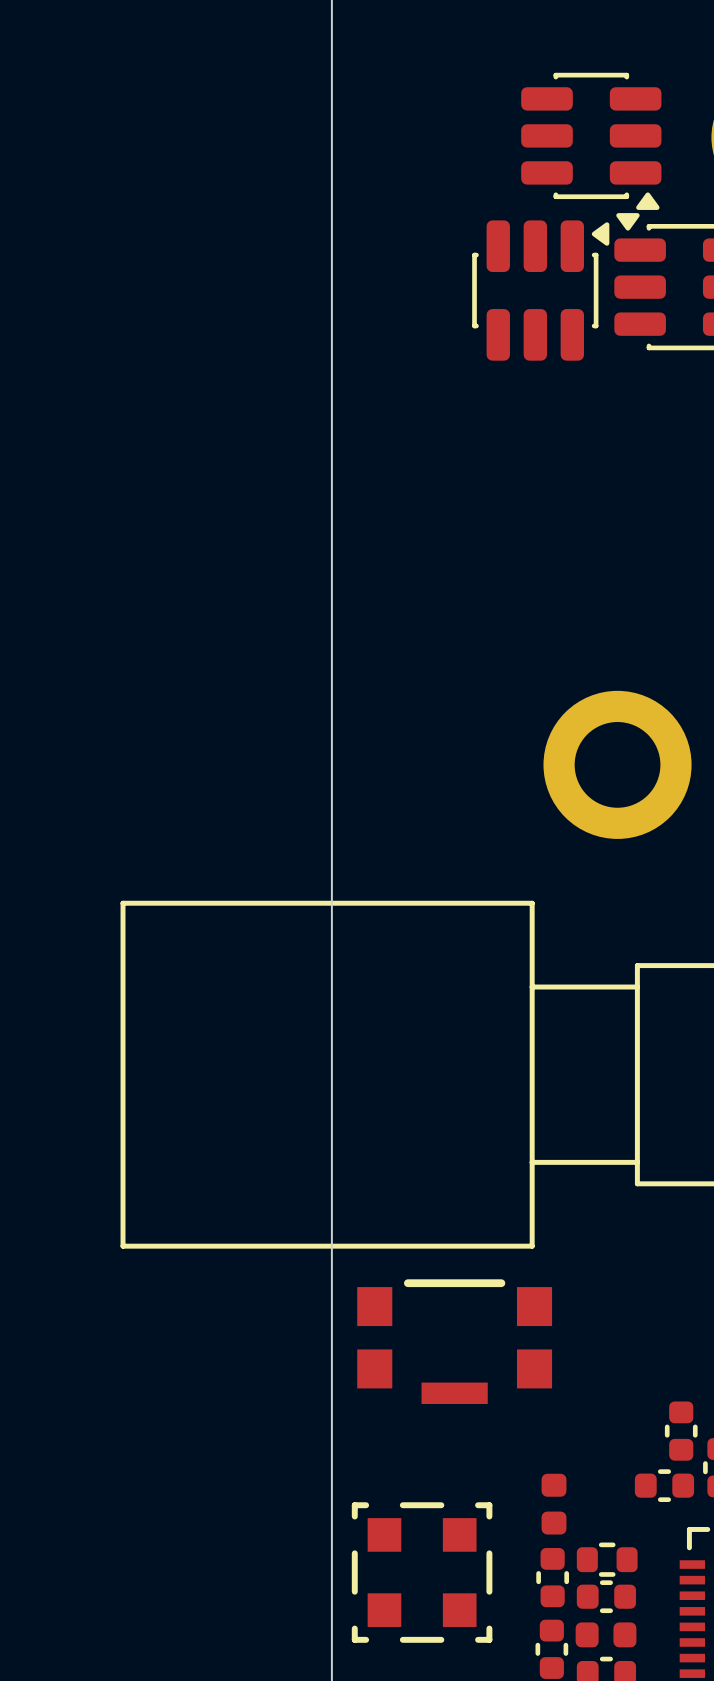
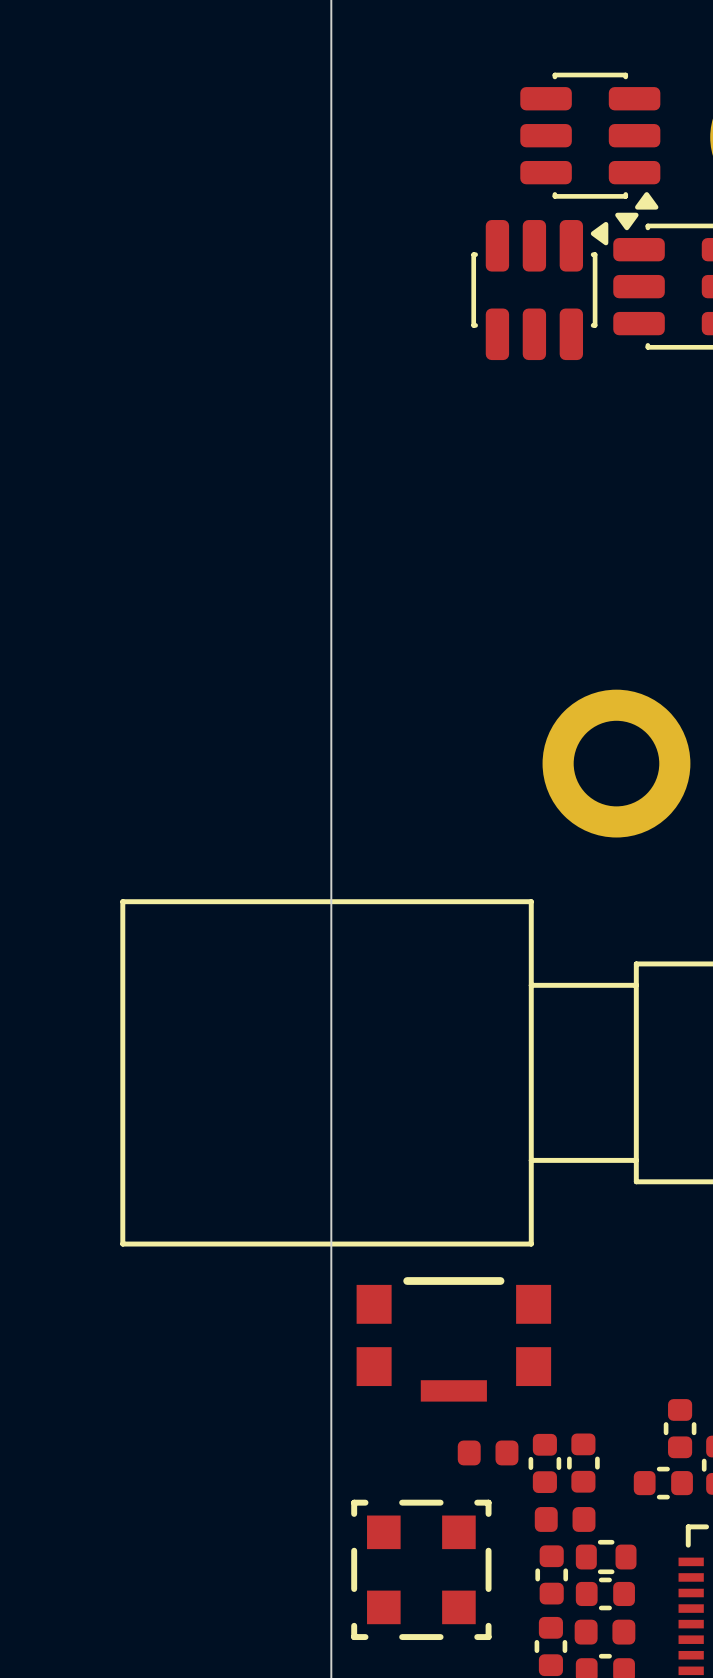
part: none -> (488, 1452)
part: none -> (544, 1463)
part: none -> (583, 1463)
part rotation: 0° (554, 1504) -> 90° clockwise (565, 1519)

